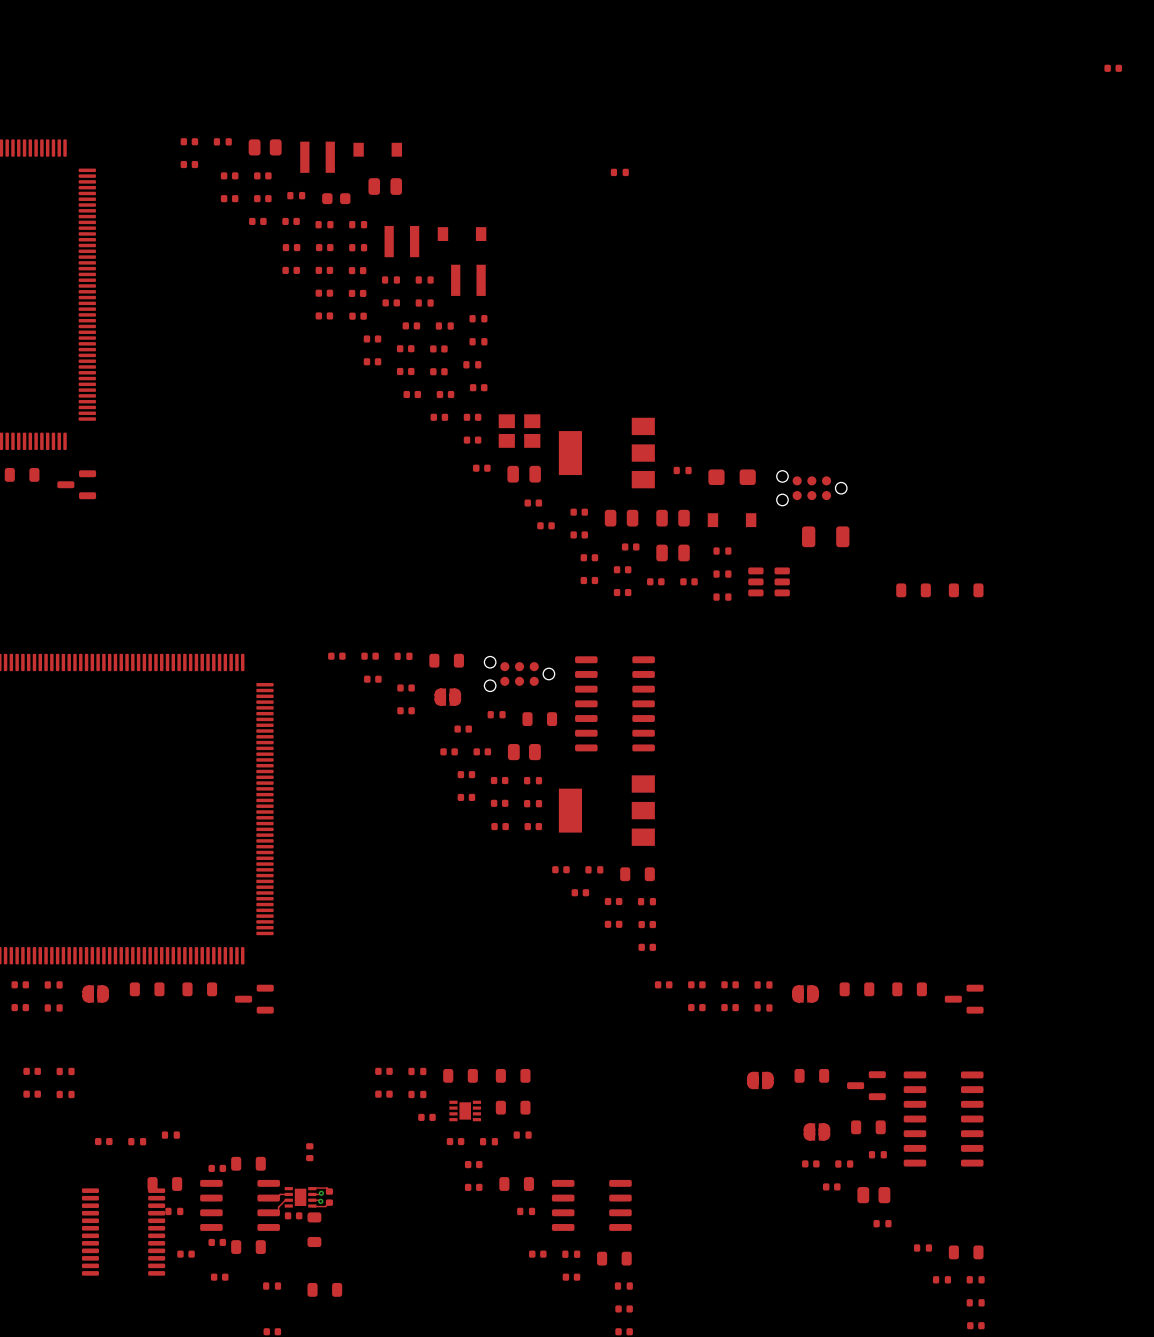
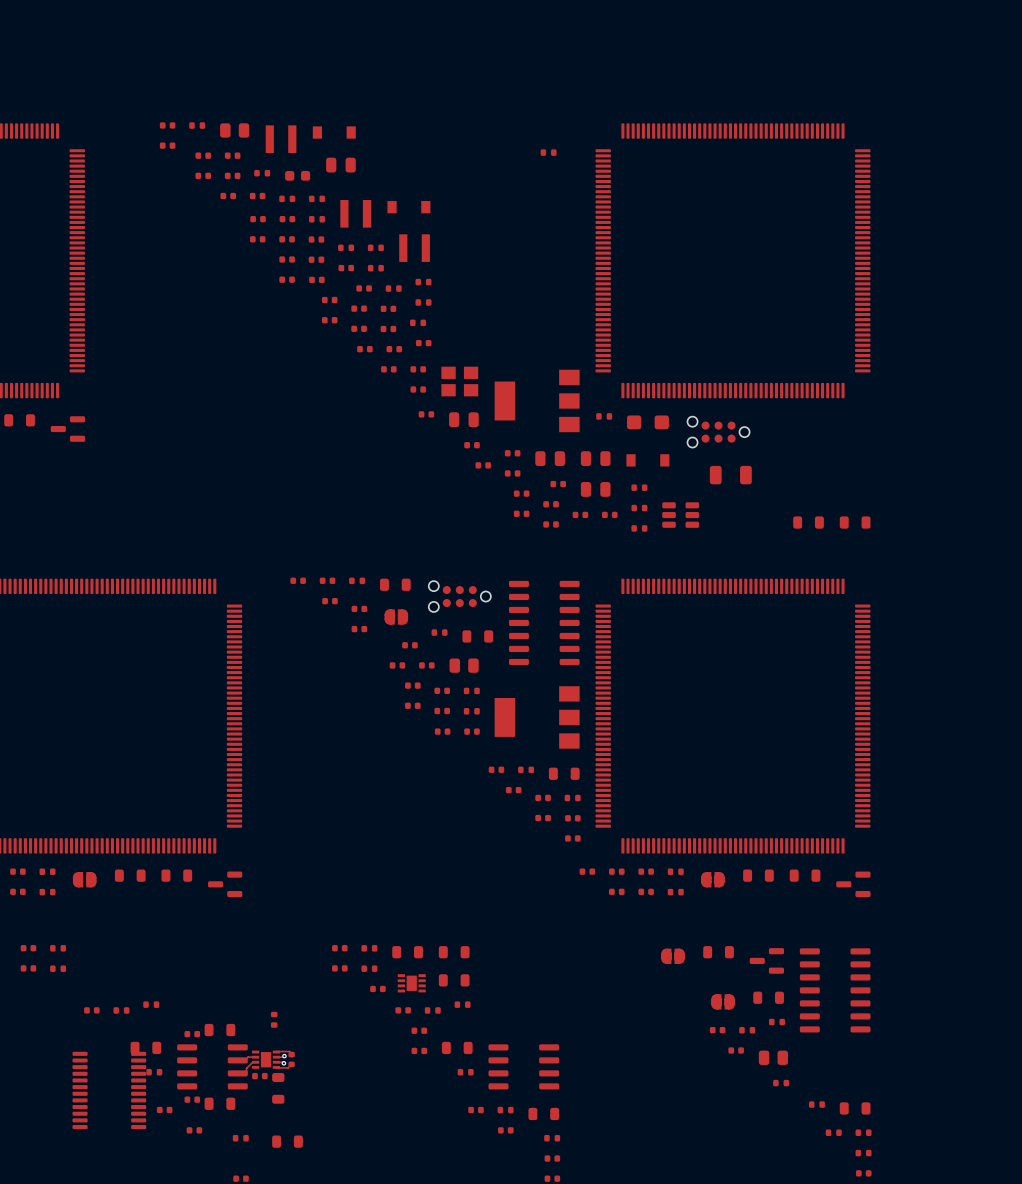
part: (1113, 68) -> none
part: none -> (732, 260)
part: none -> (732, 716)

